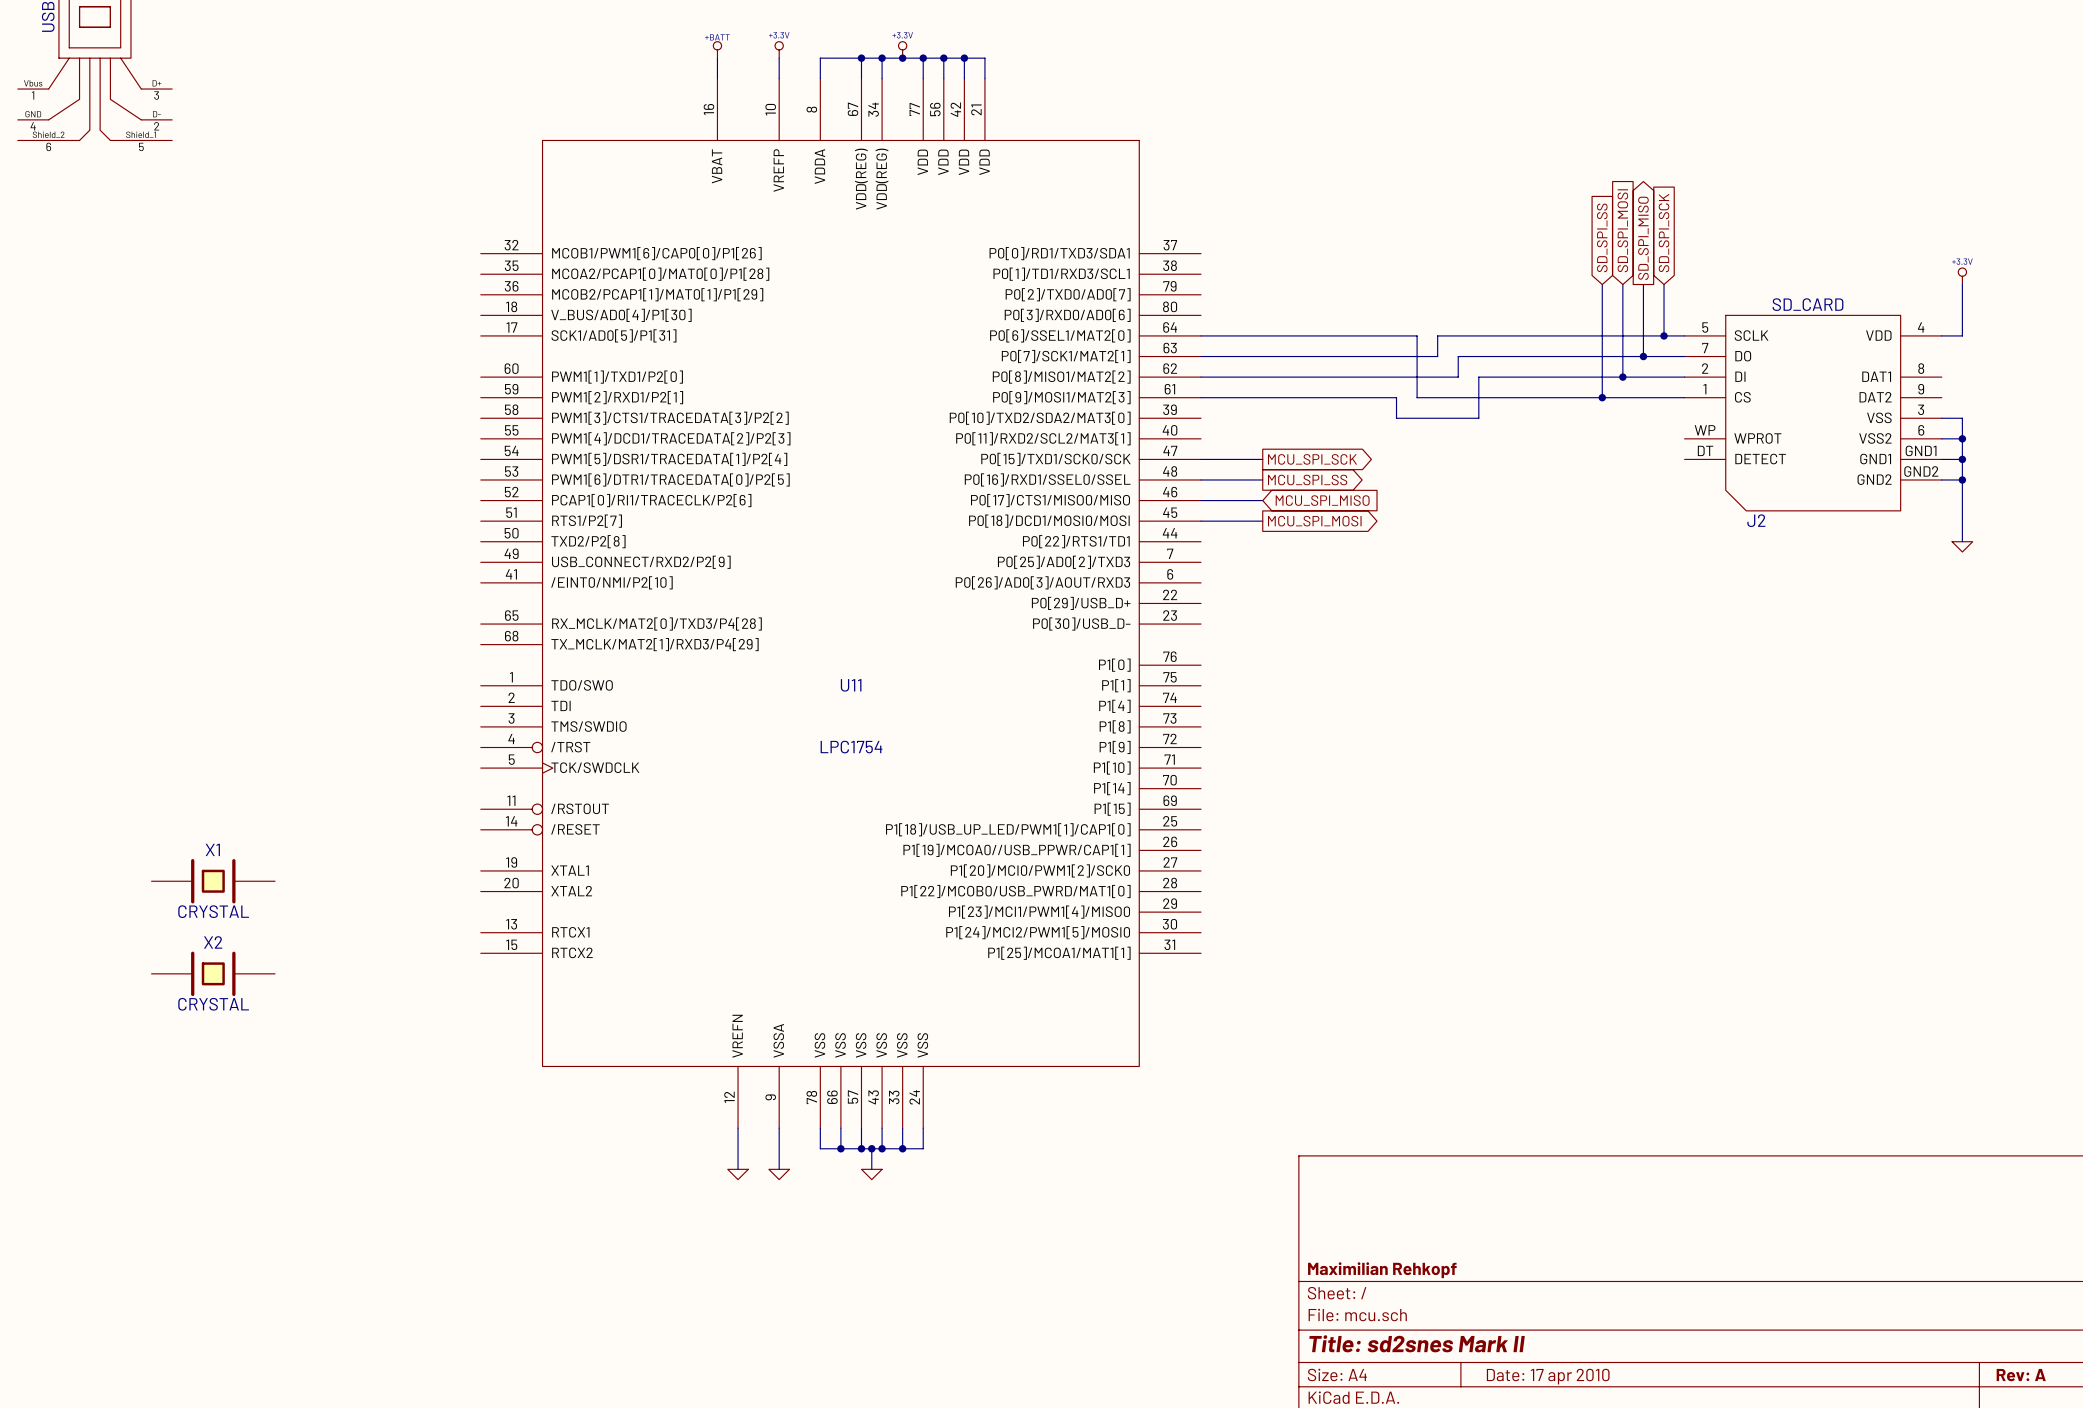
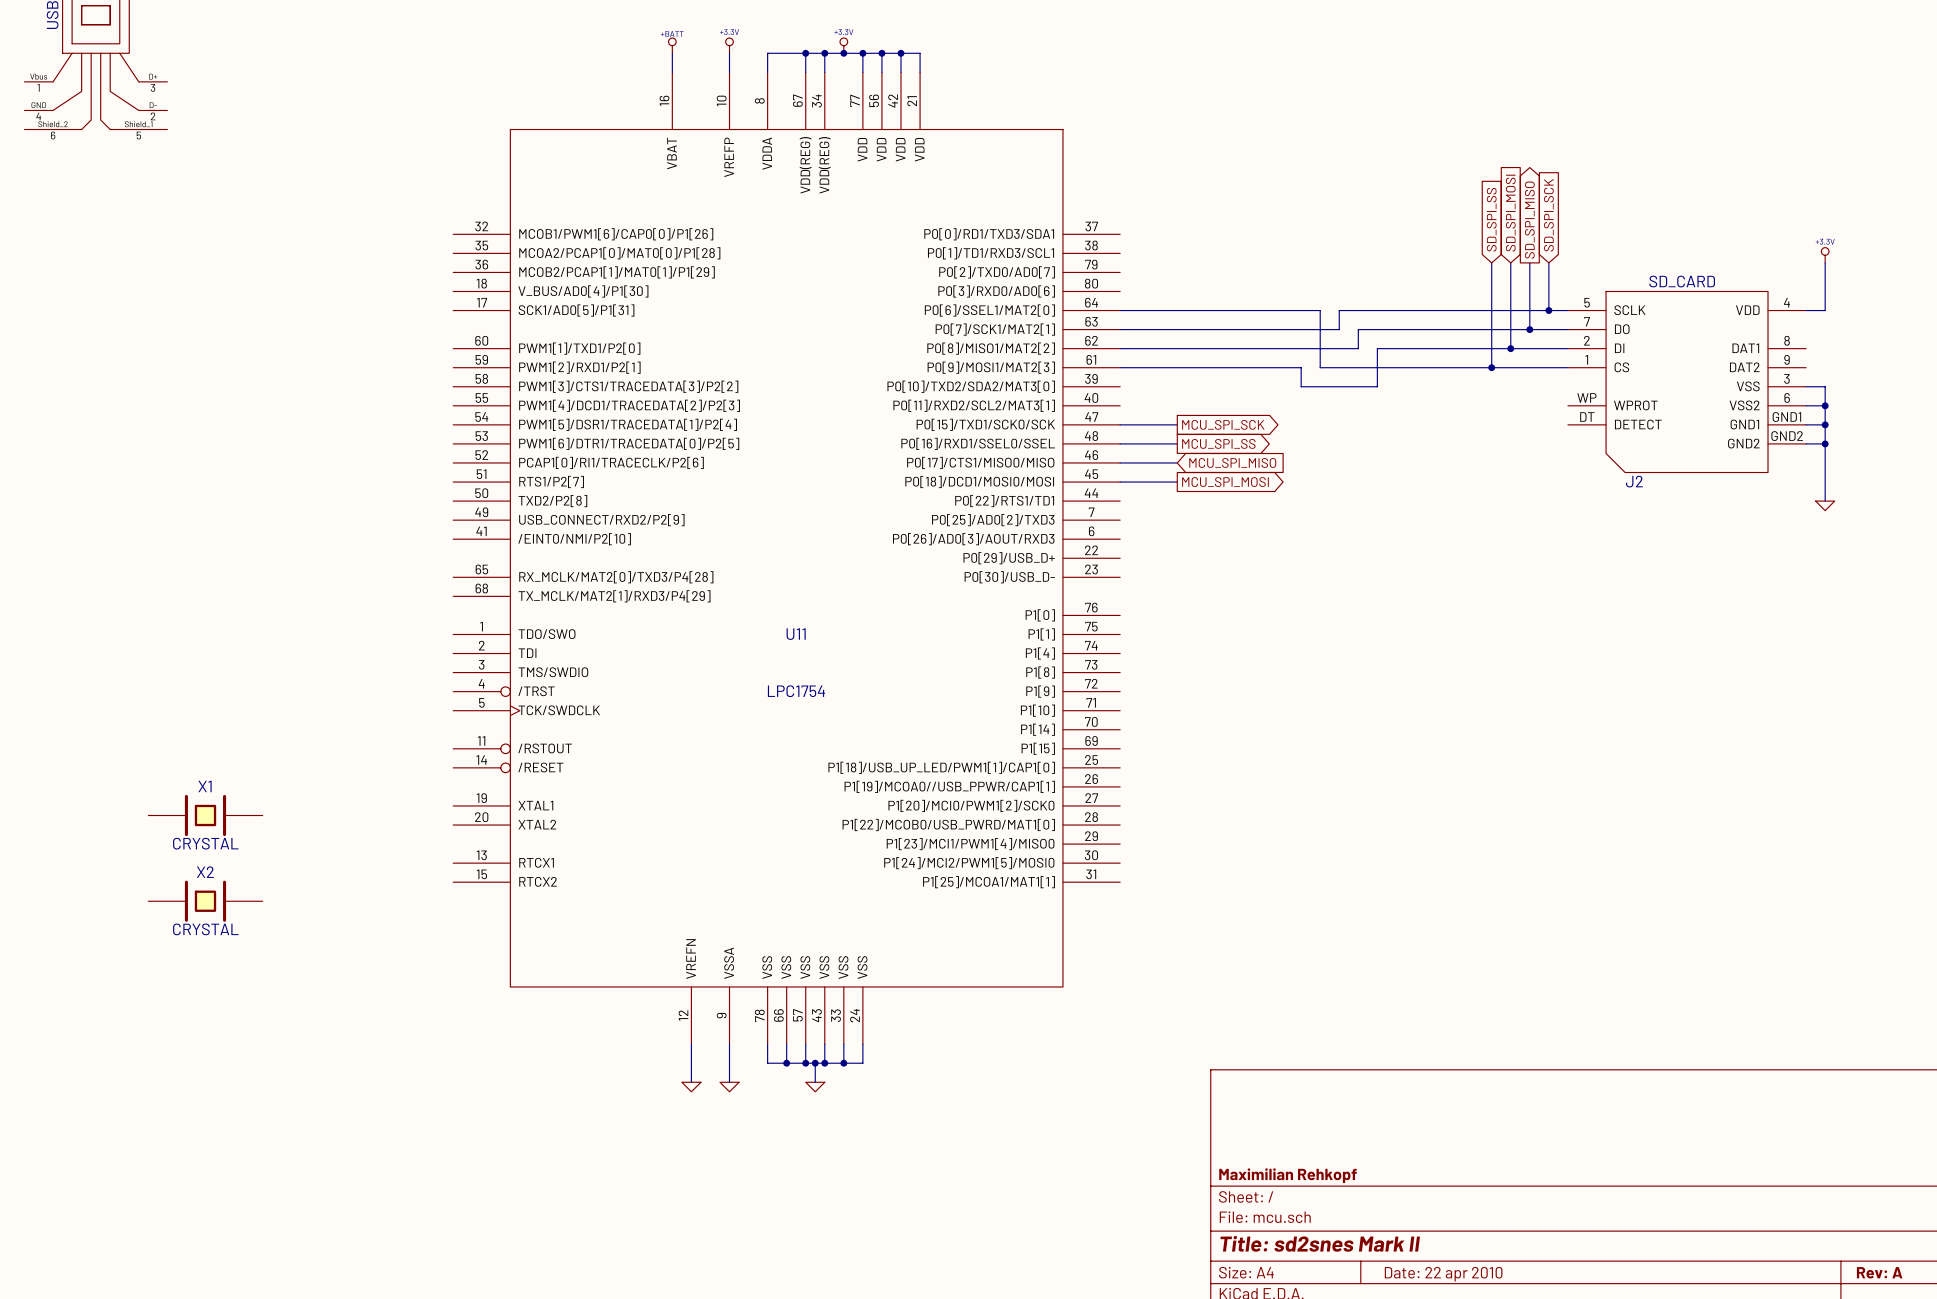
title block: Date: 17 apr 2010 (1548, 1376) -> Date: 22 apr 2010 (1443, 1274)

